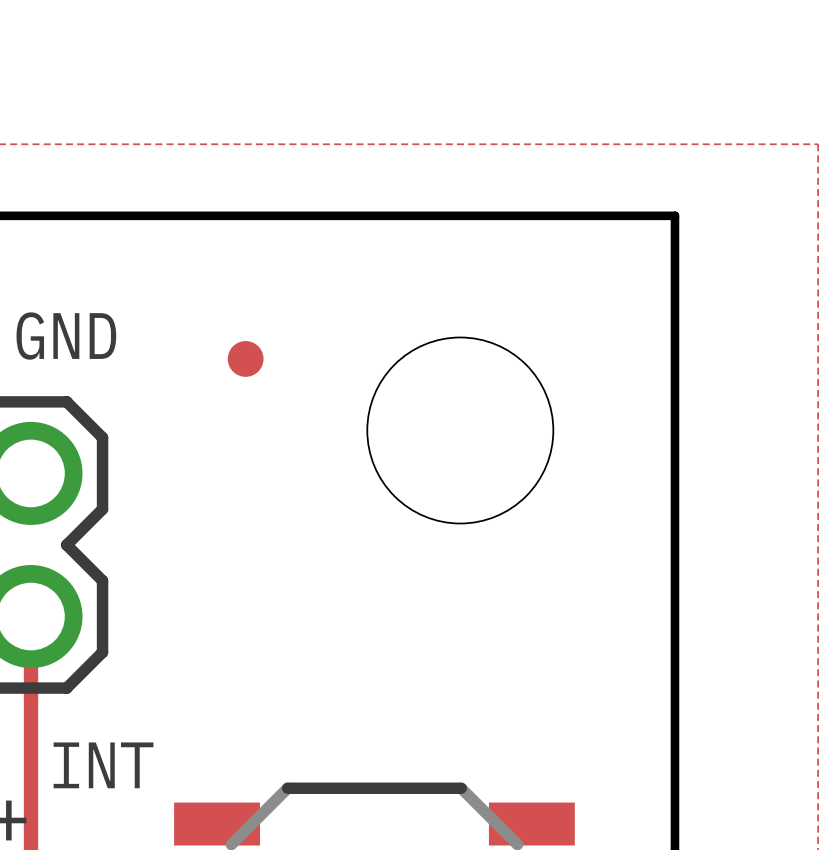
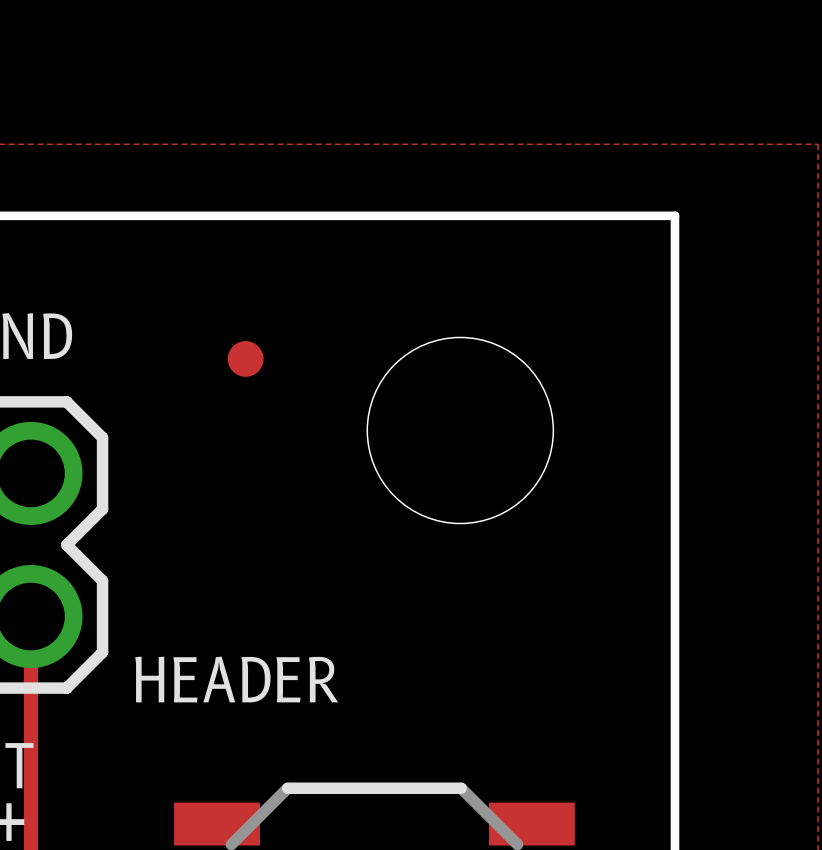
HEADER name: none -> HEADER (236, 679)

